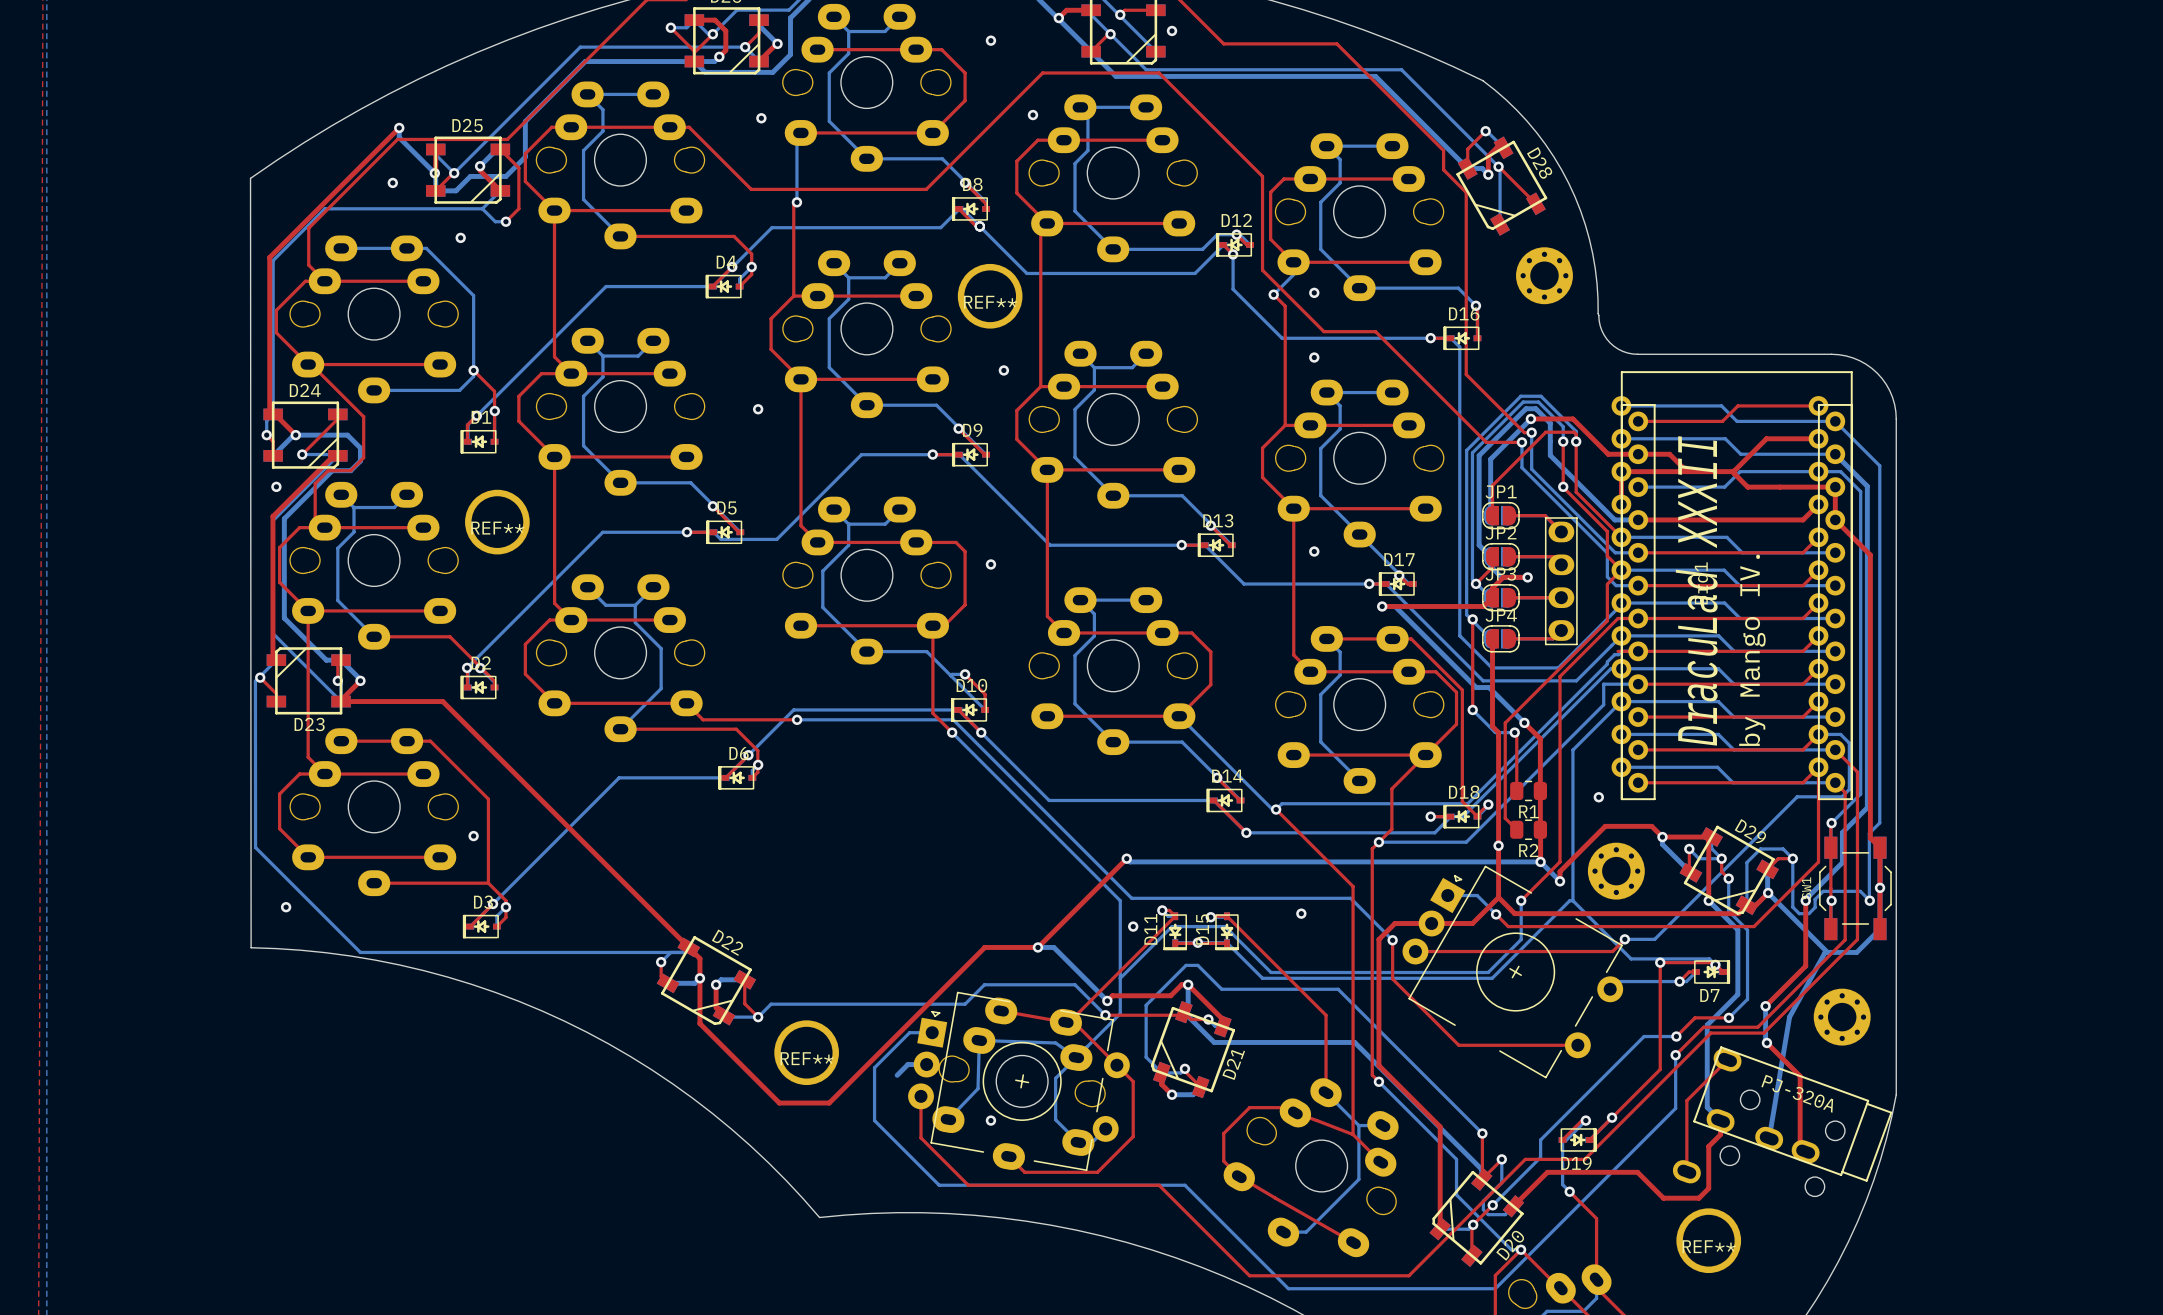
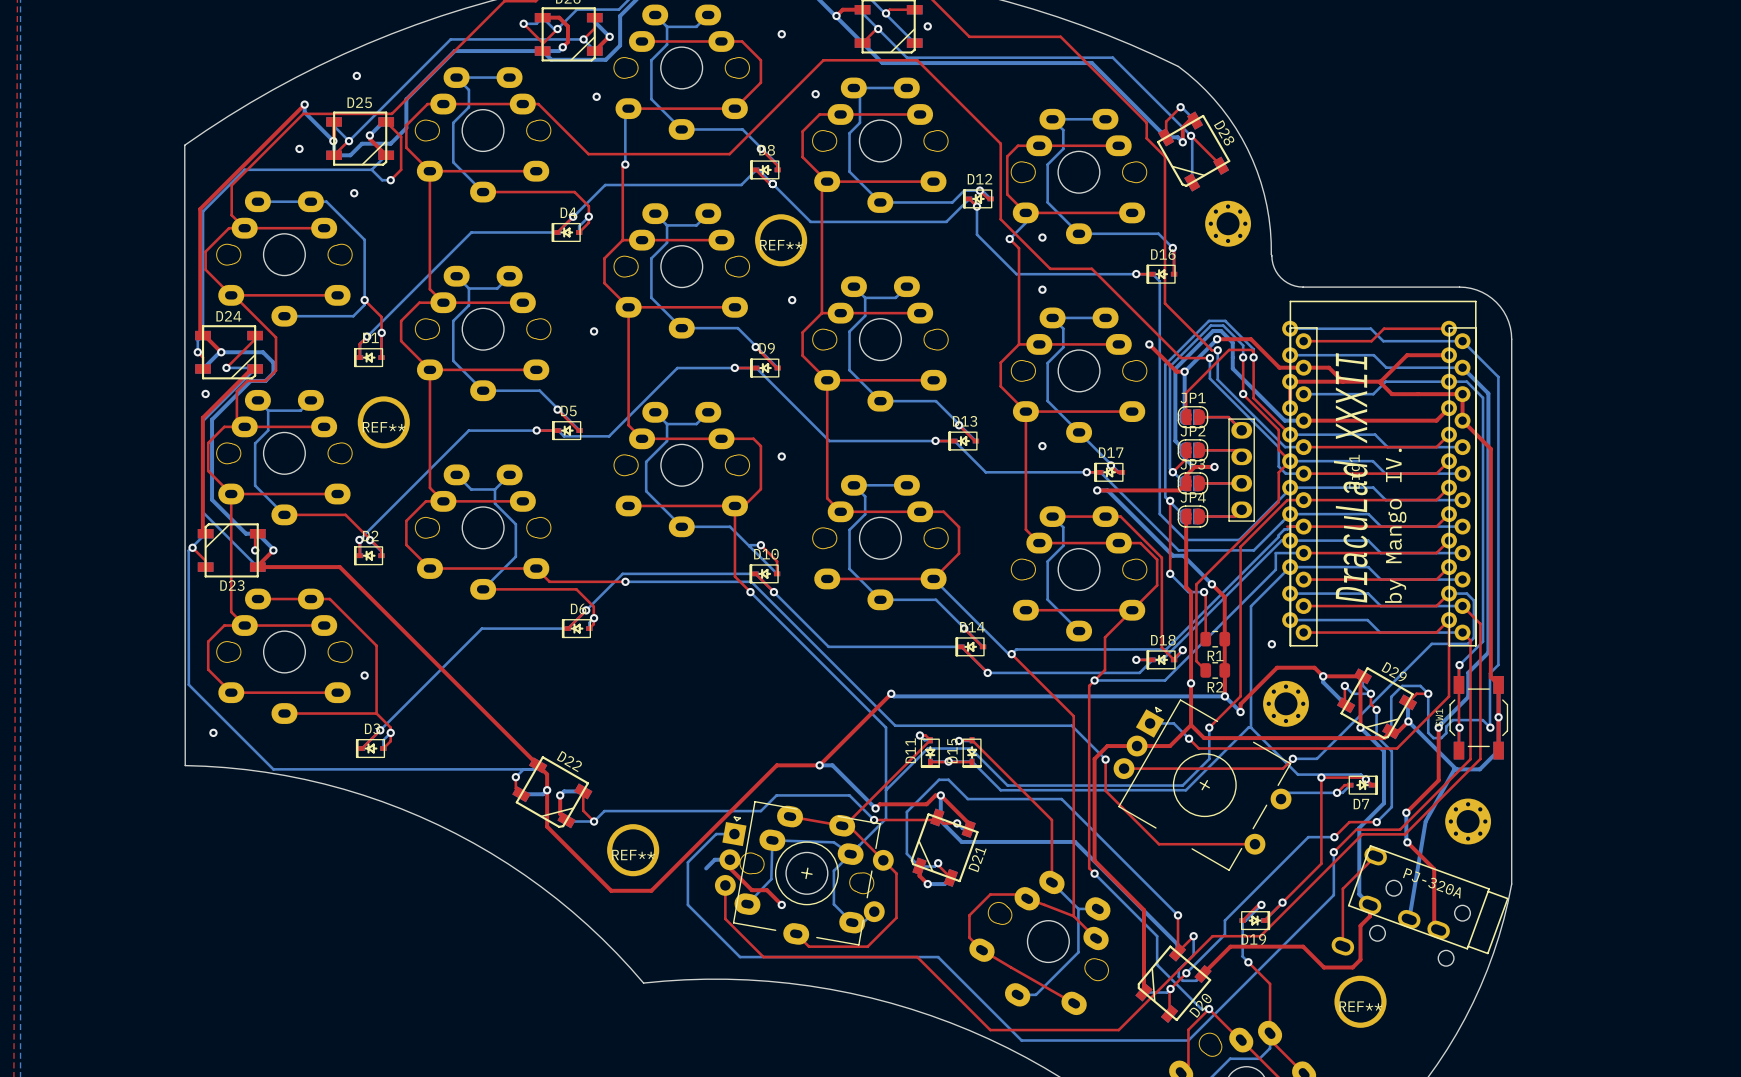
via: none -> (356, 75)
top track: none -> (1149, 344) (1176, 371) (1184, 371)
via: none -> (1149, 344)
via: none -> (1184, 371)
via: (1301, 913) -> none
via: (1133, 926) -> none
top track: none -> (729, 859) (729, 868) (751, 890) (767, 890) (781, 904)

